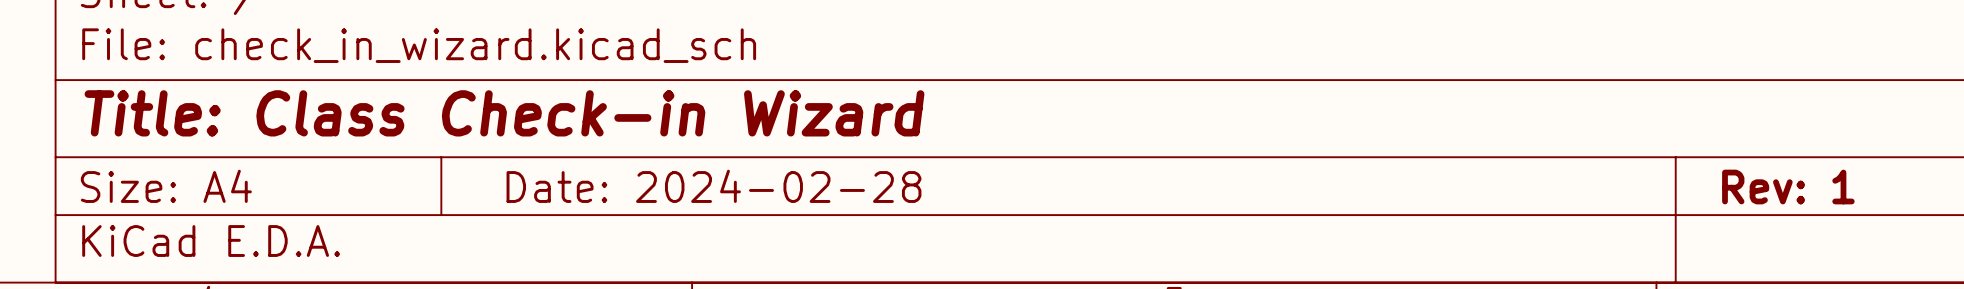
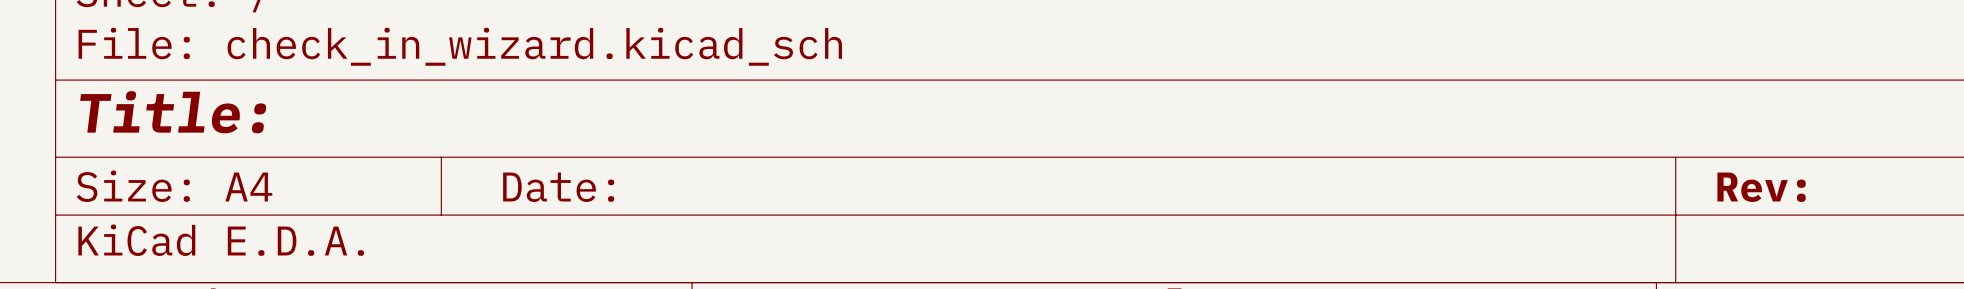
title block: Title: Class Check-in Wizard (504, 113) -> Title: (173, 112)
title block: Date: 2024-02-28 (713, 186) -> Date: (558, 187)
title block: Rev: 1 (1788, 187) -> Rev: (1761, 187)

